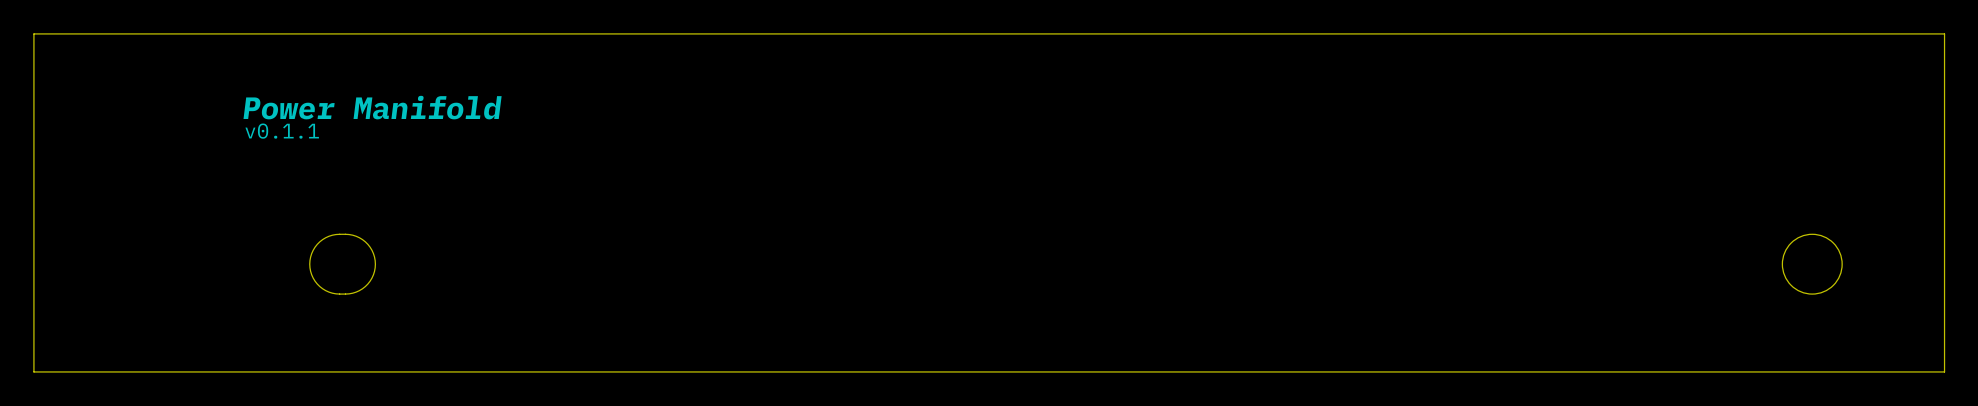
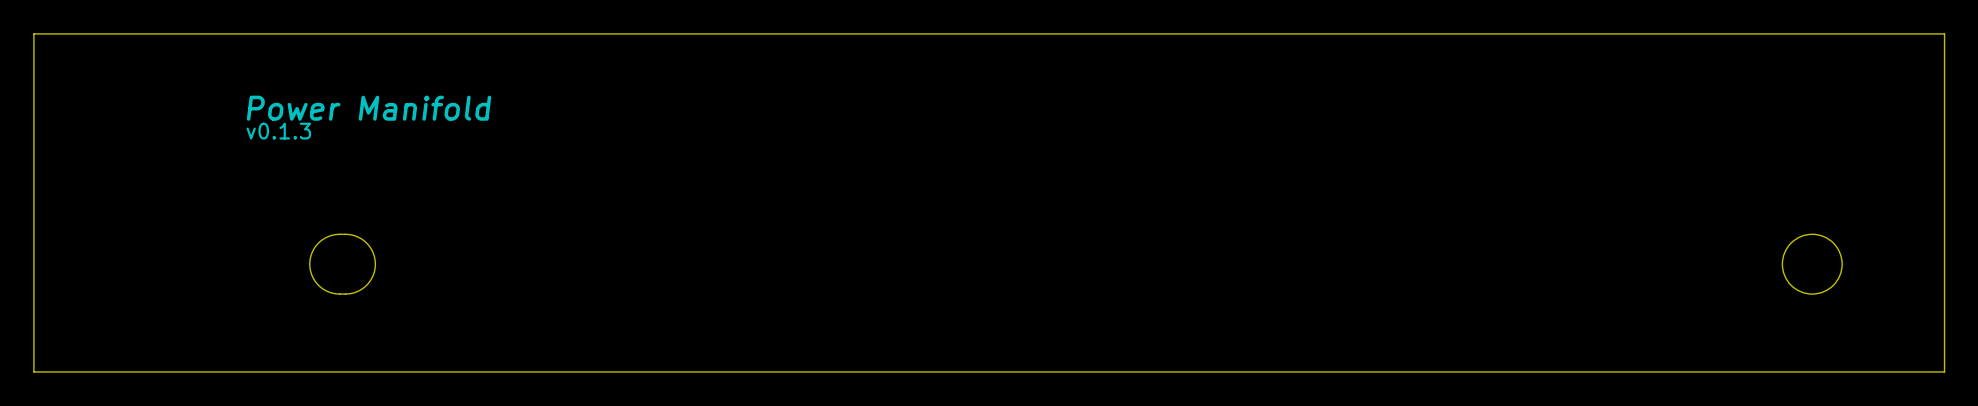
text: v0.1.1 (282, 131) -> v0.1.3 (278, 131)

